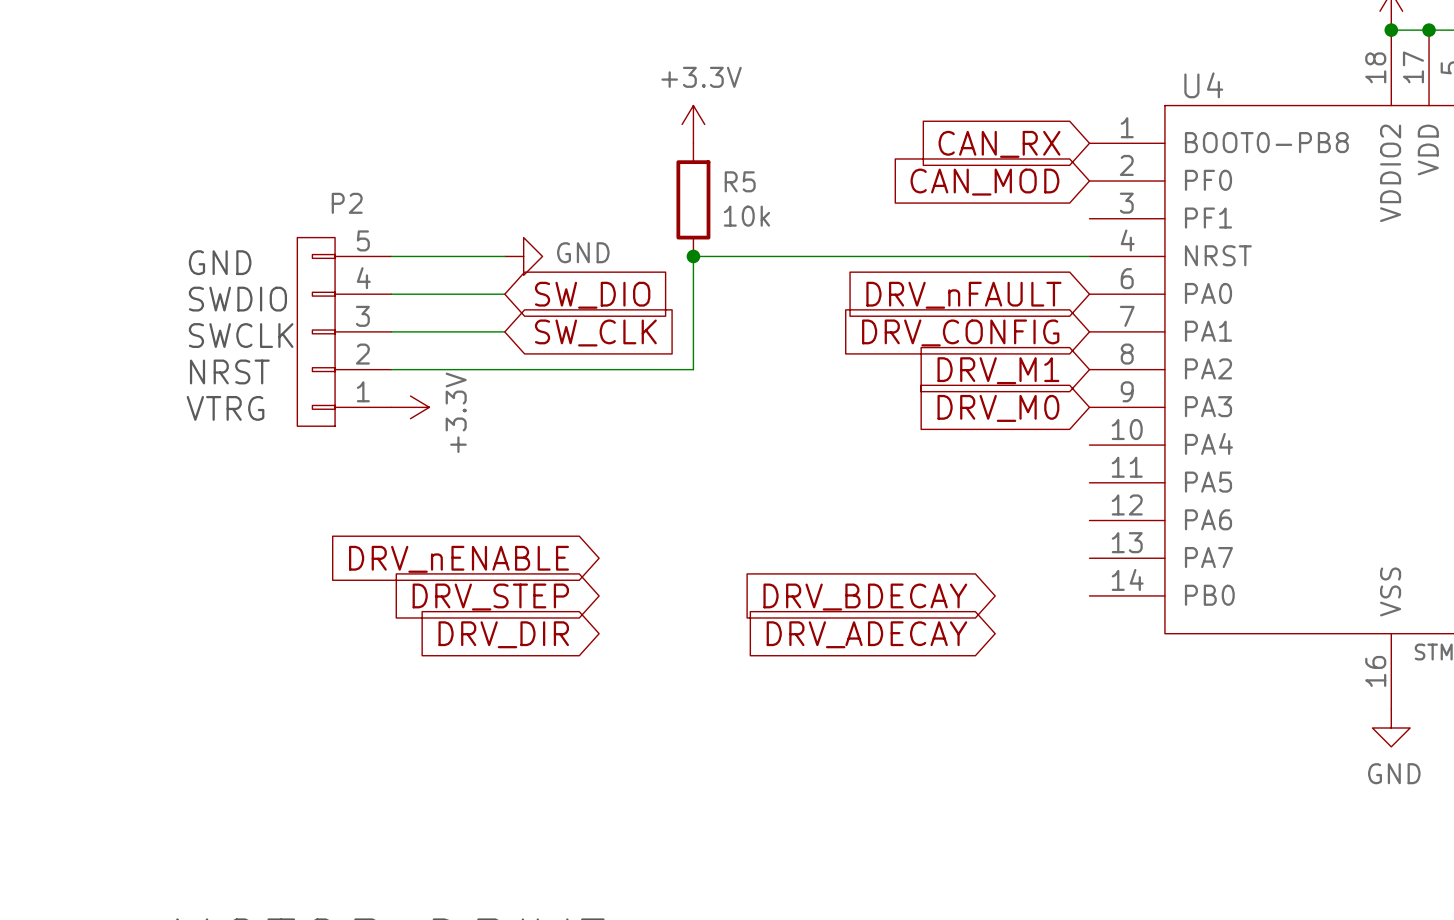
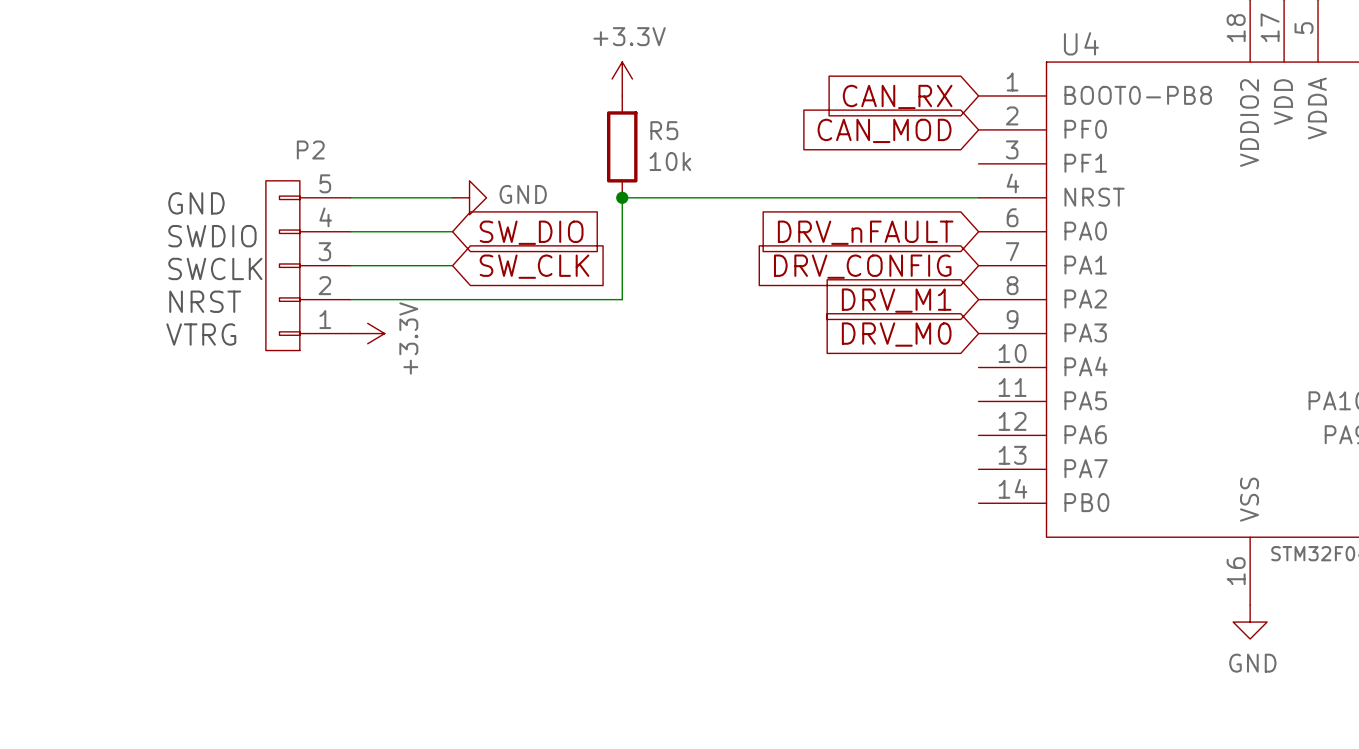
global label: DRV_nENABLE (458, 559) -> none
global label: DRV_STEP (490, 597) -> none
global label: DRV_BDECAY (865, 597) -> none
global label: DRV_DIR (503, 634) -> none
global label: DRV_ADECAY (866, 634) -> none

